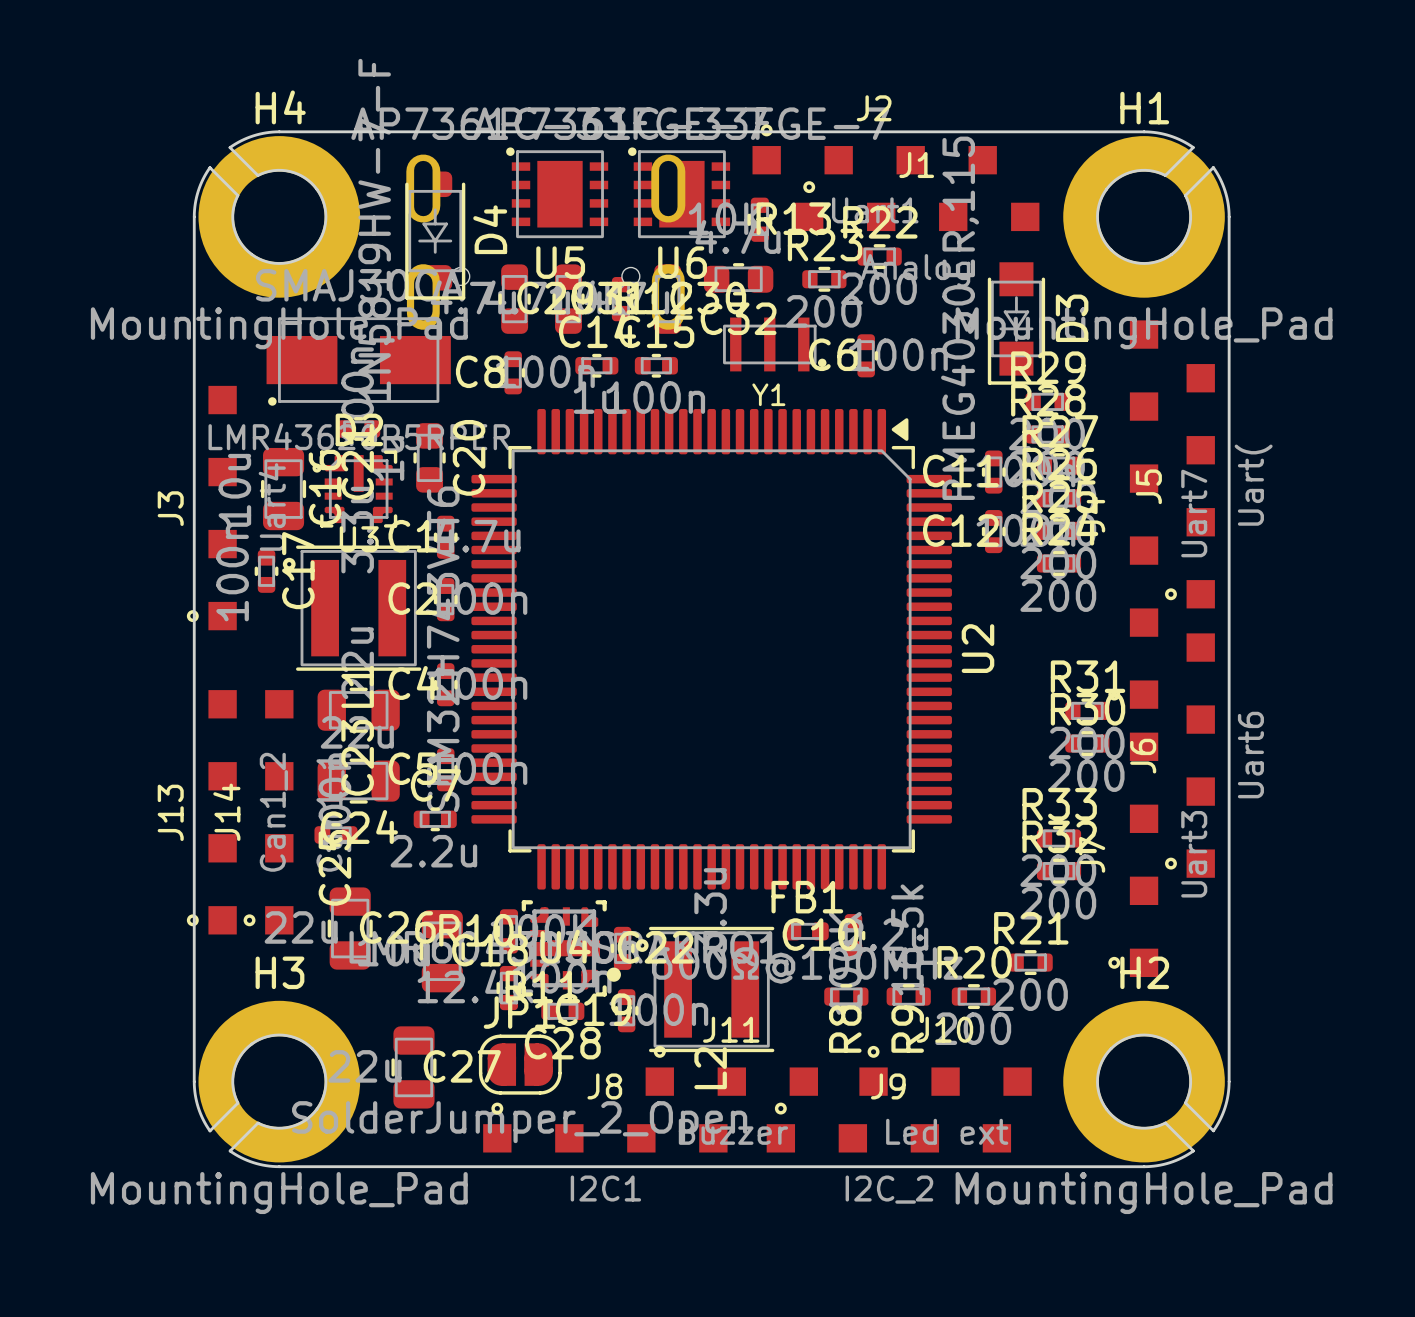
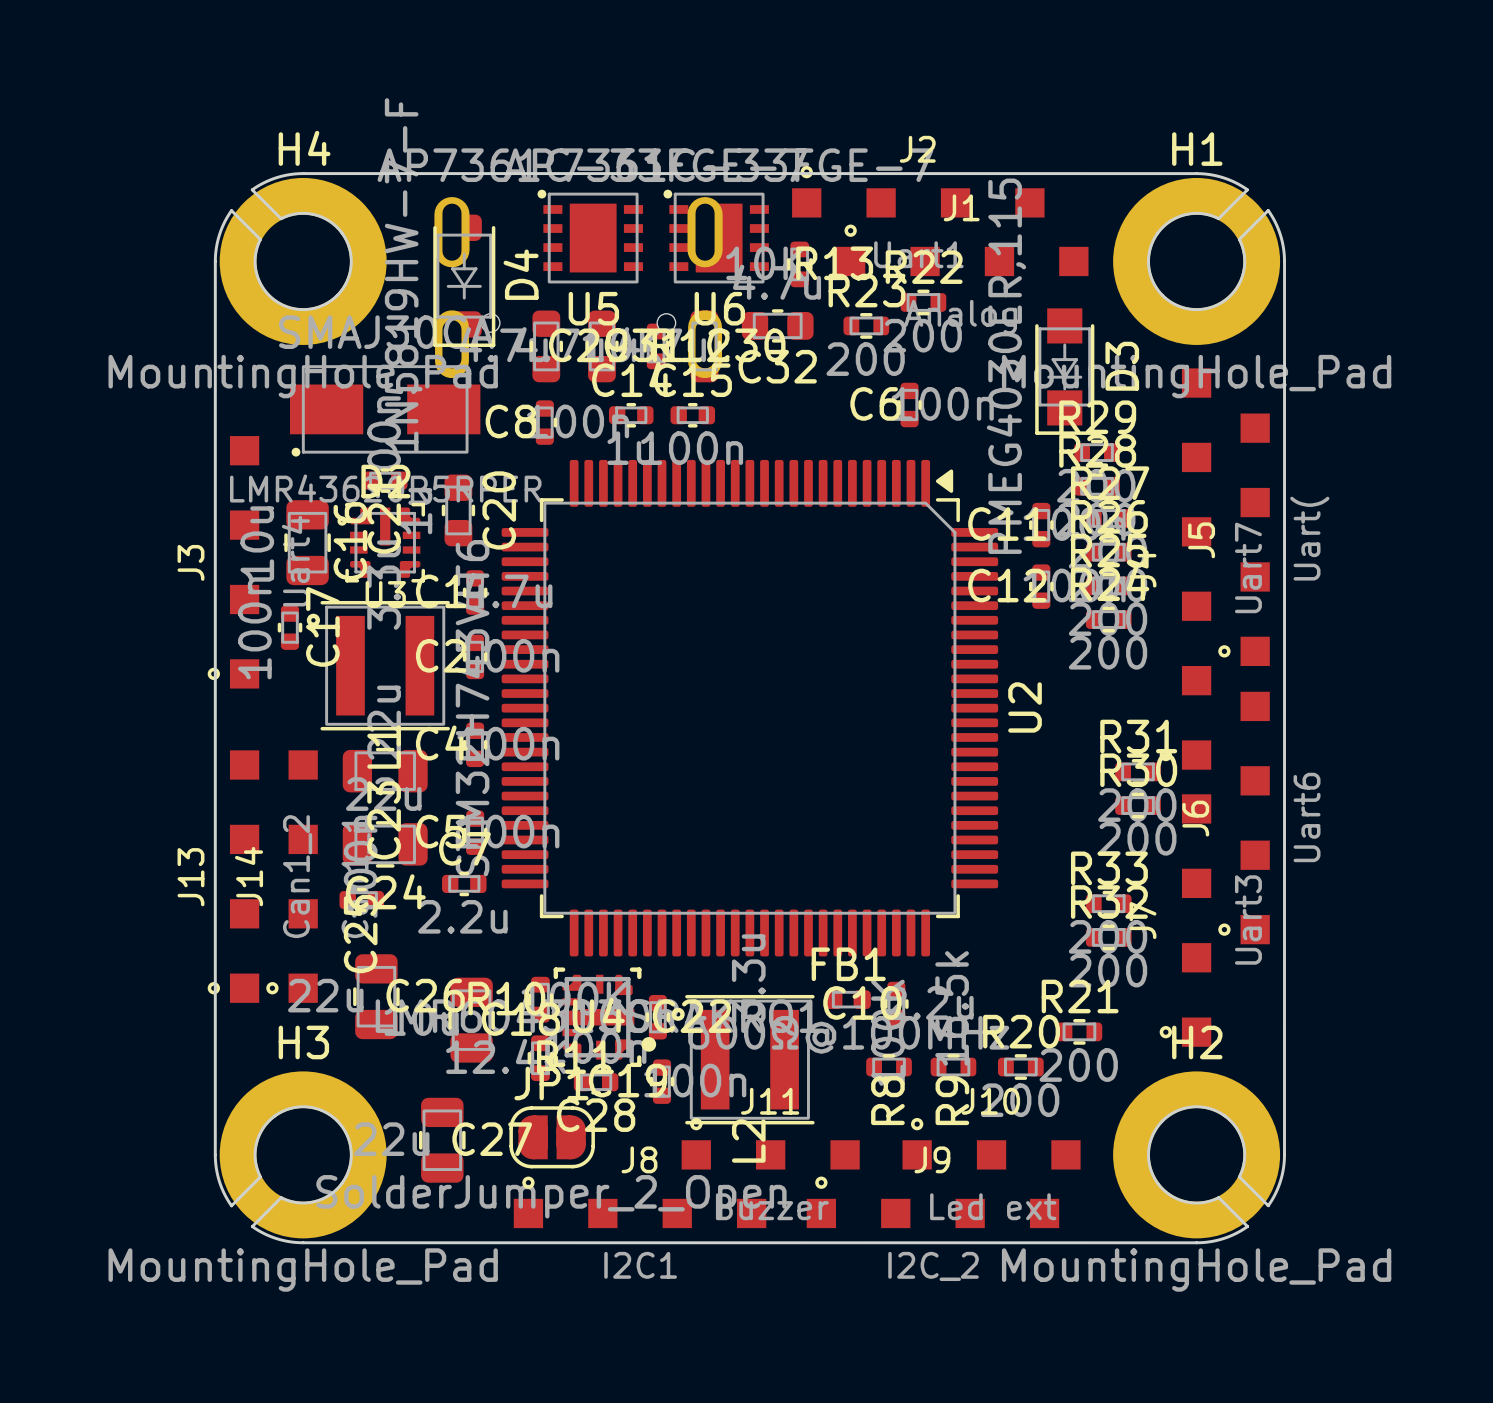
Y1: (774, 344) -> none

